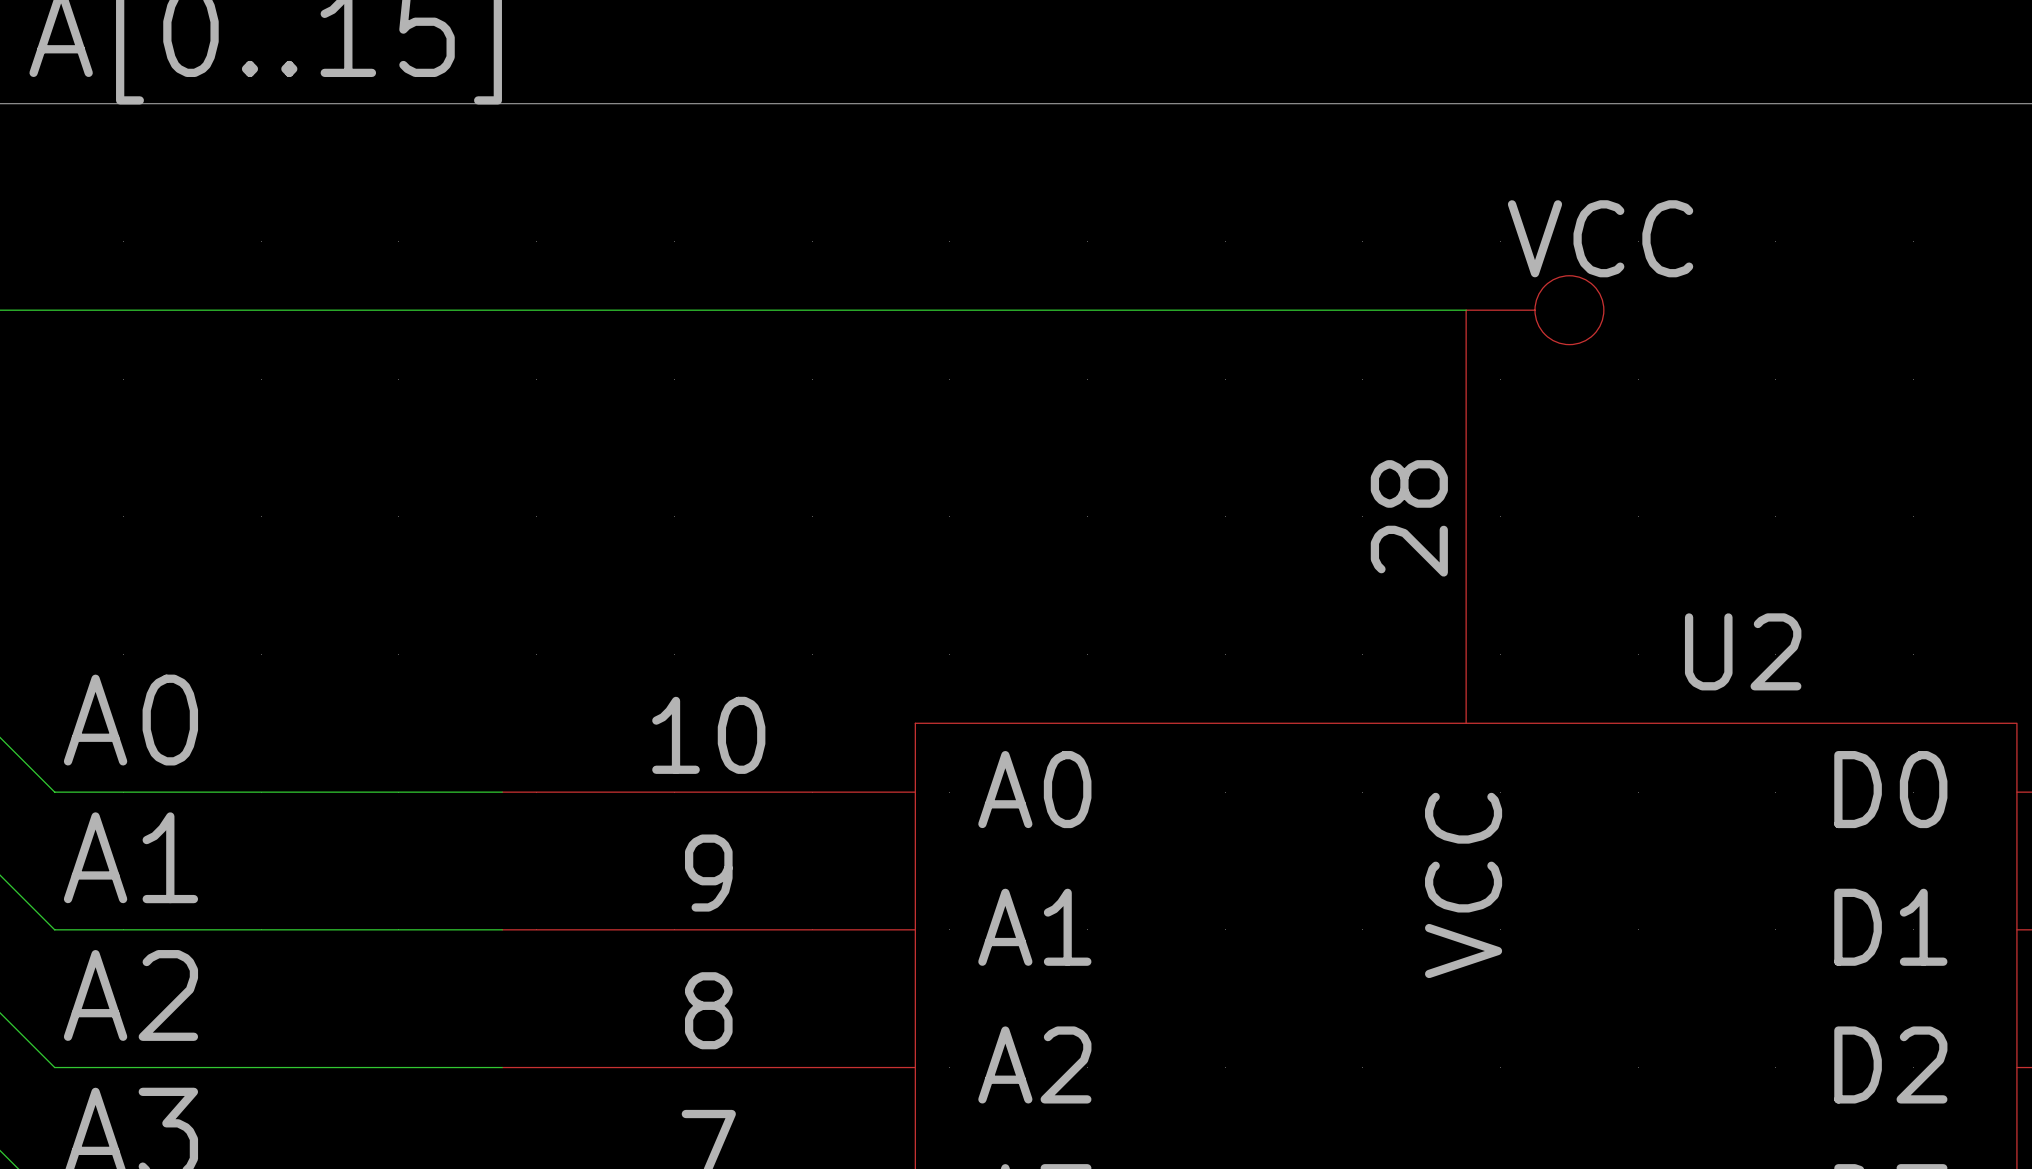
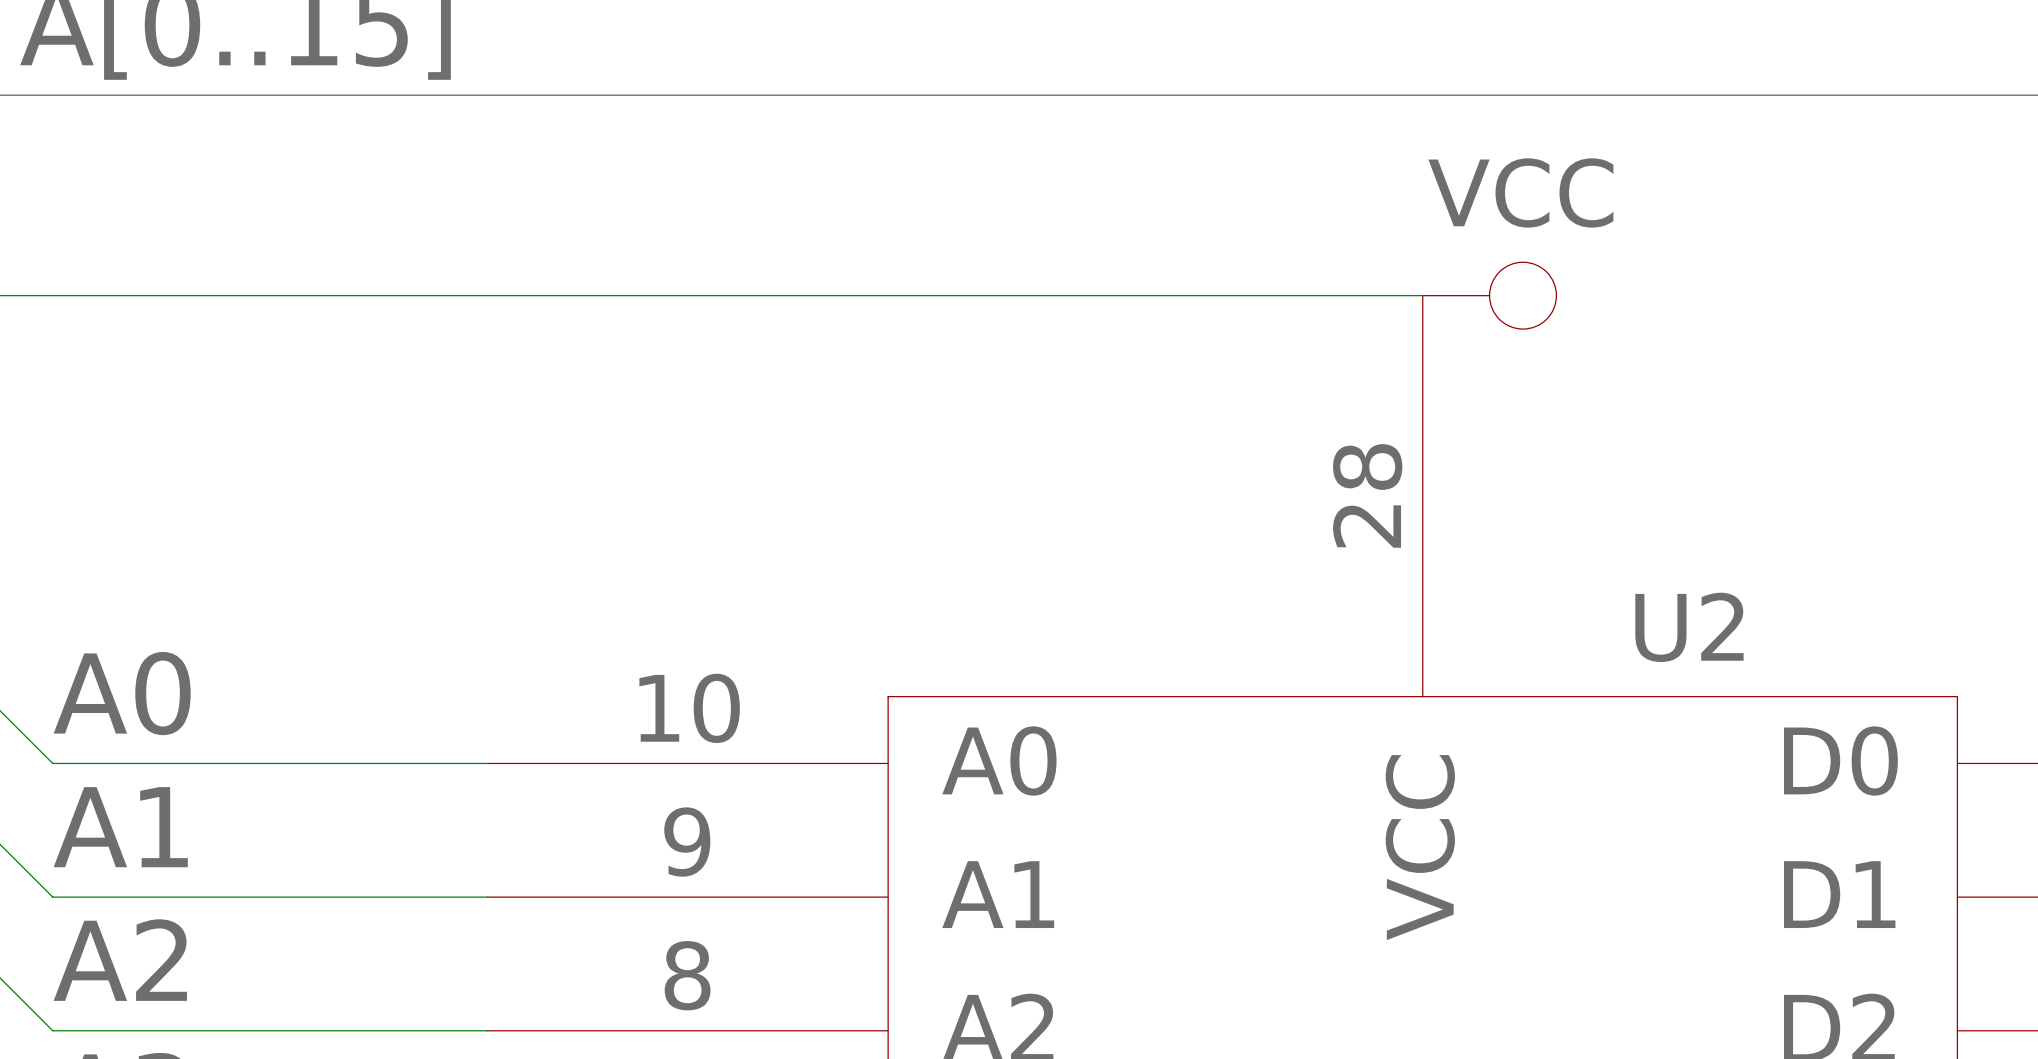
power symbol text position: VCC (1600, 238) -> VCC (1520, 192)

